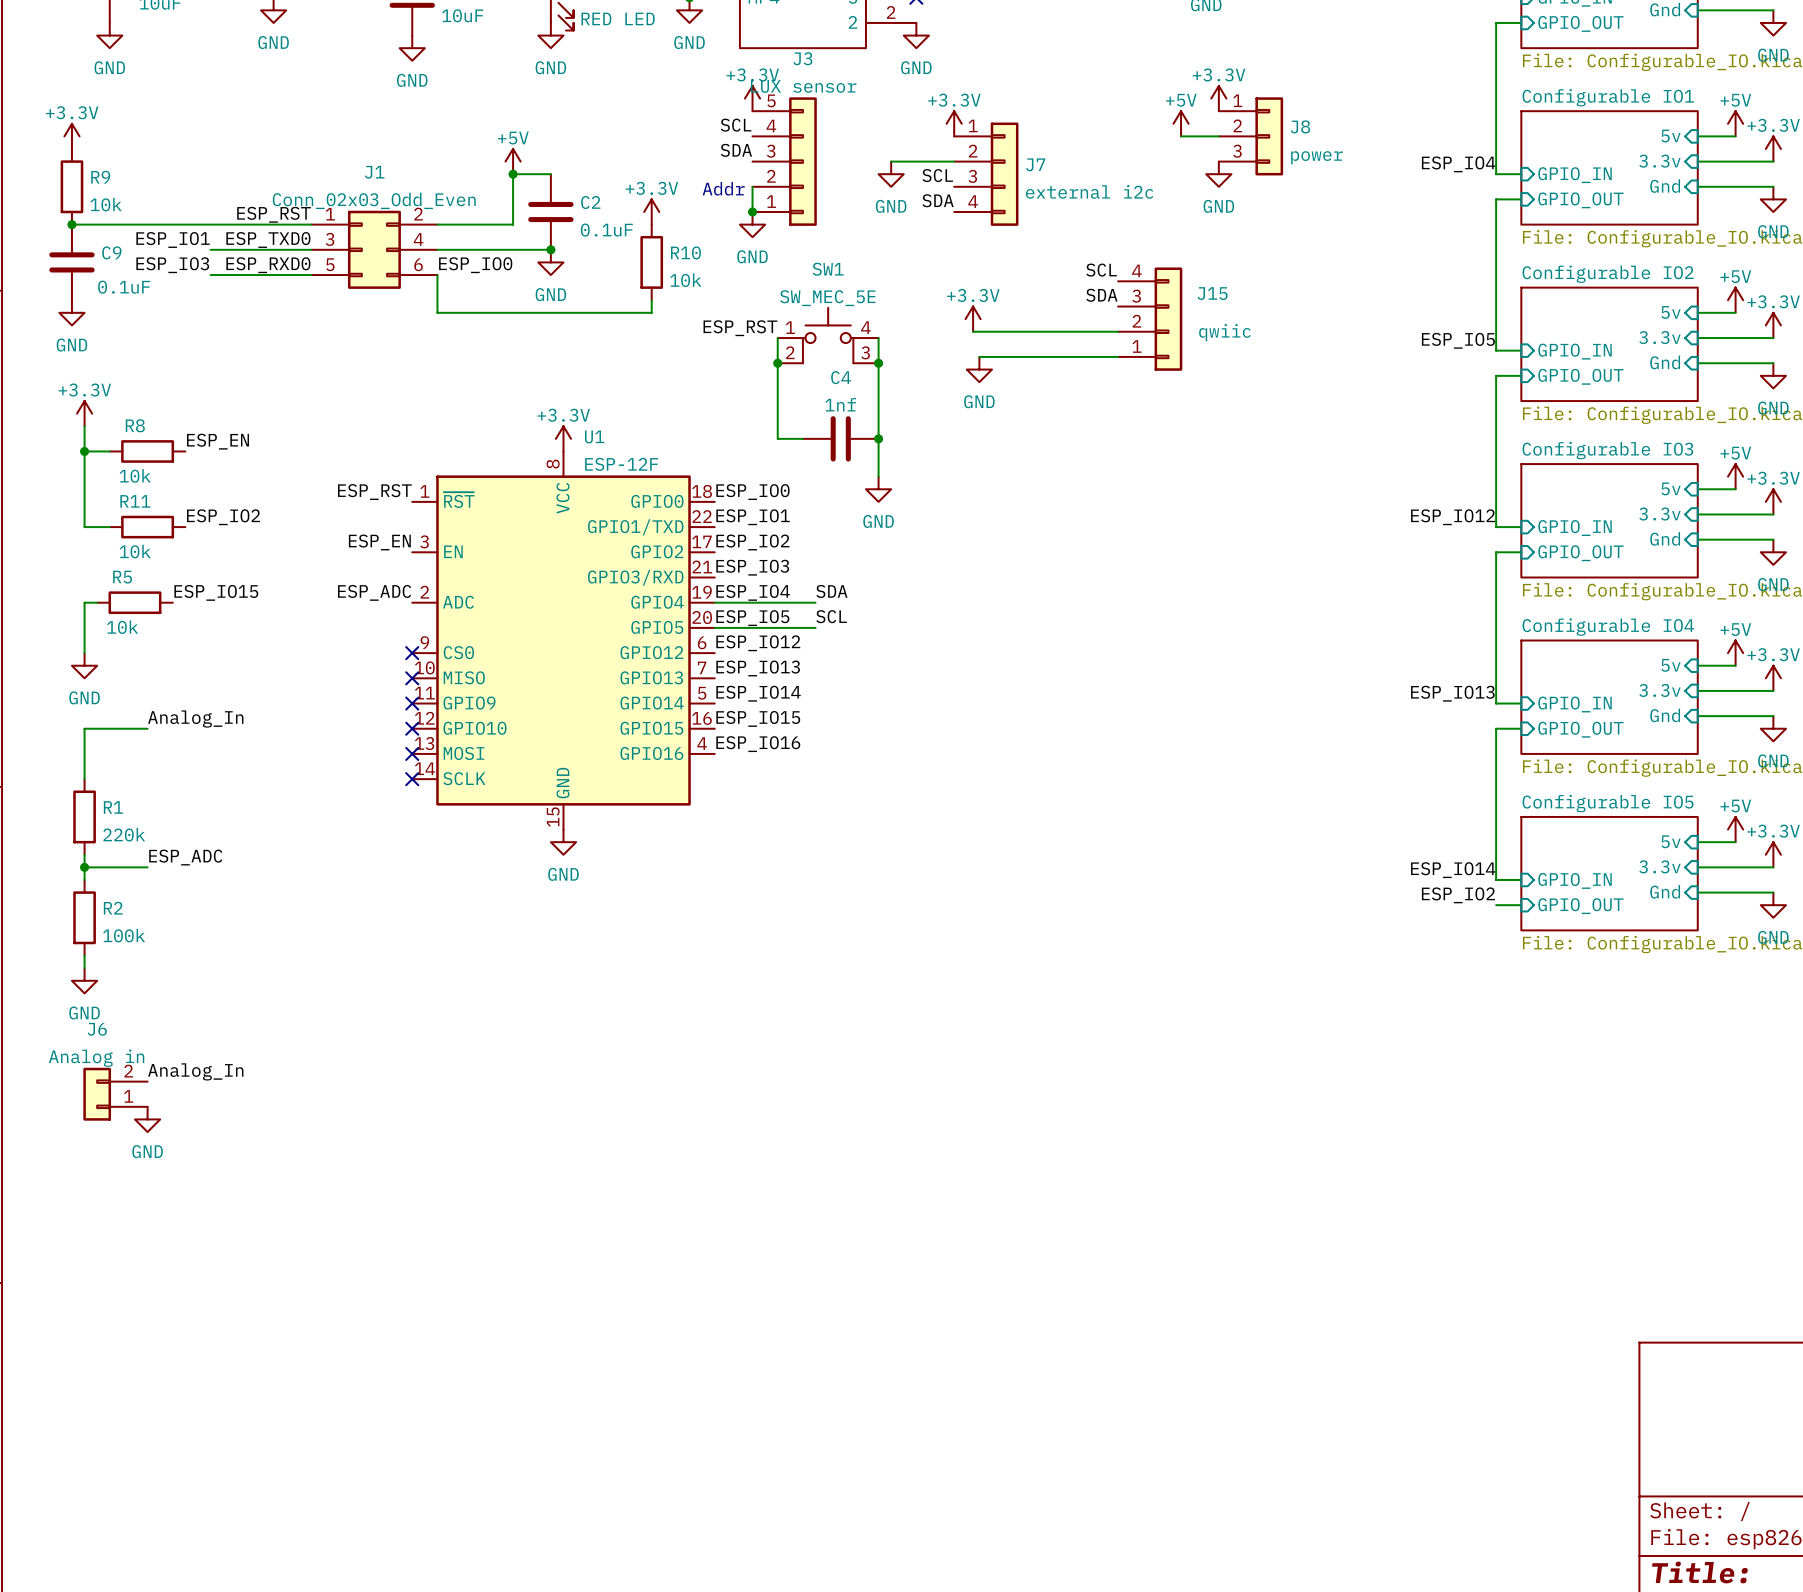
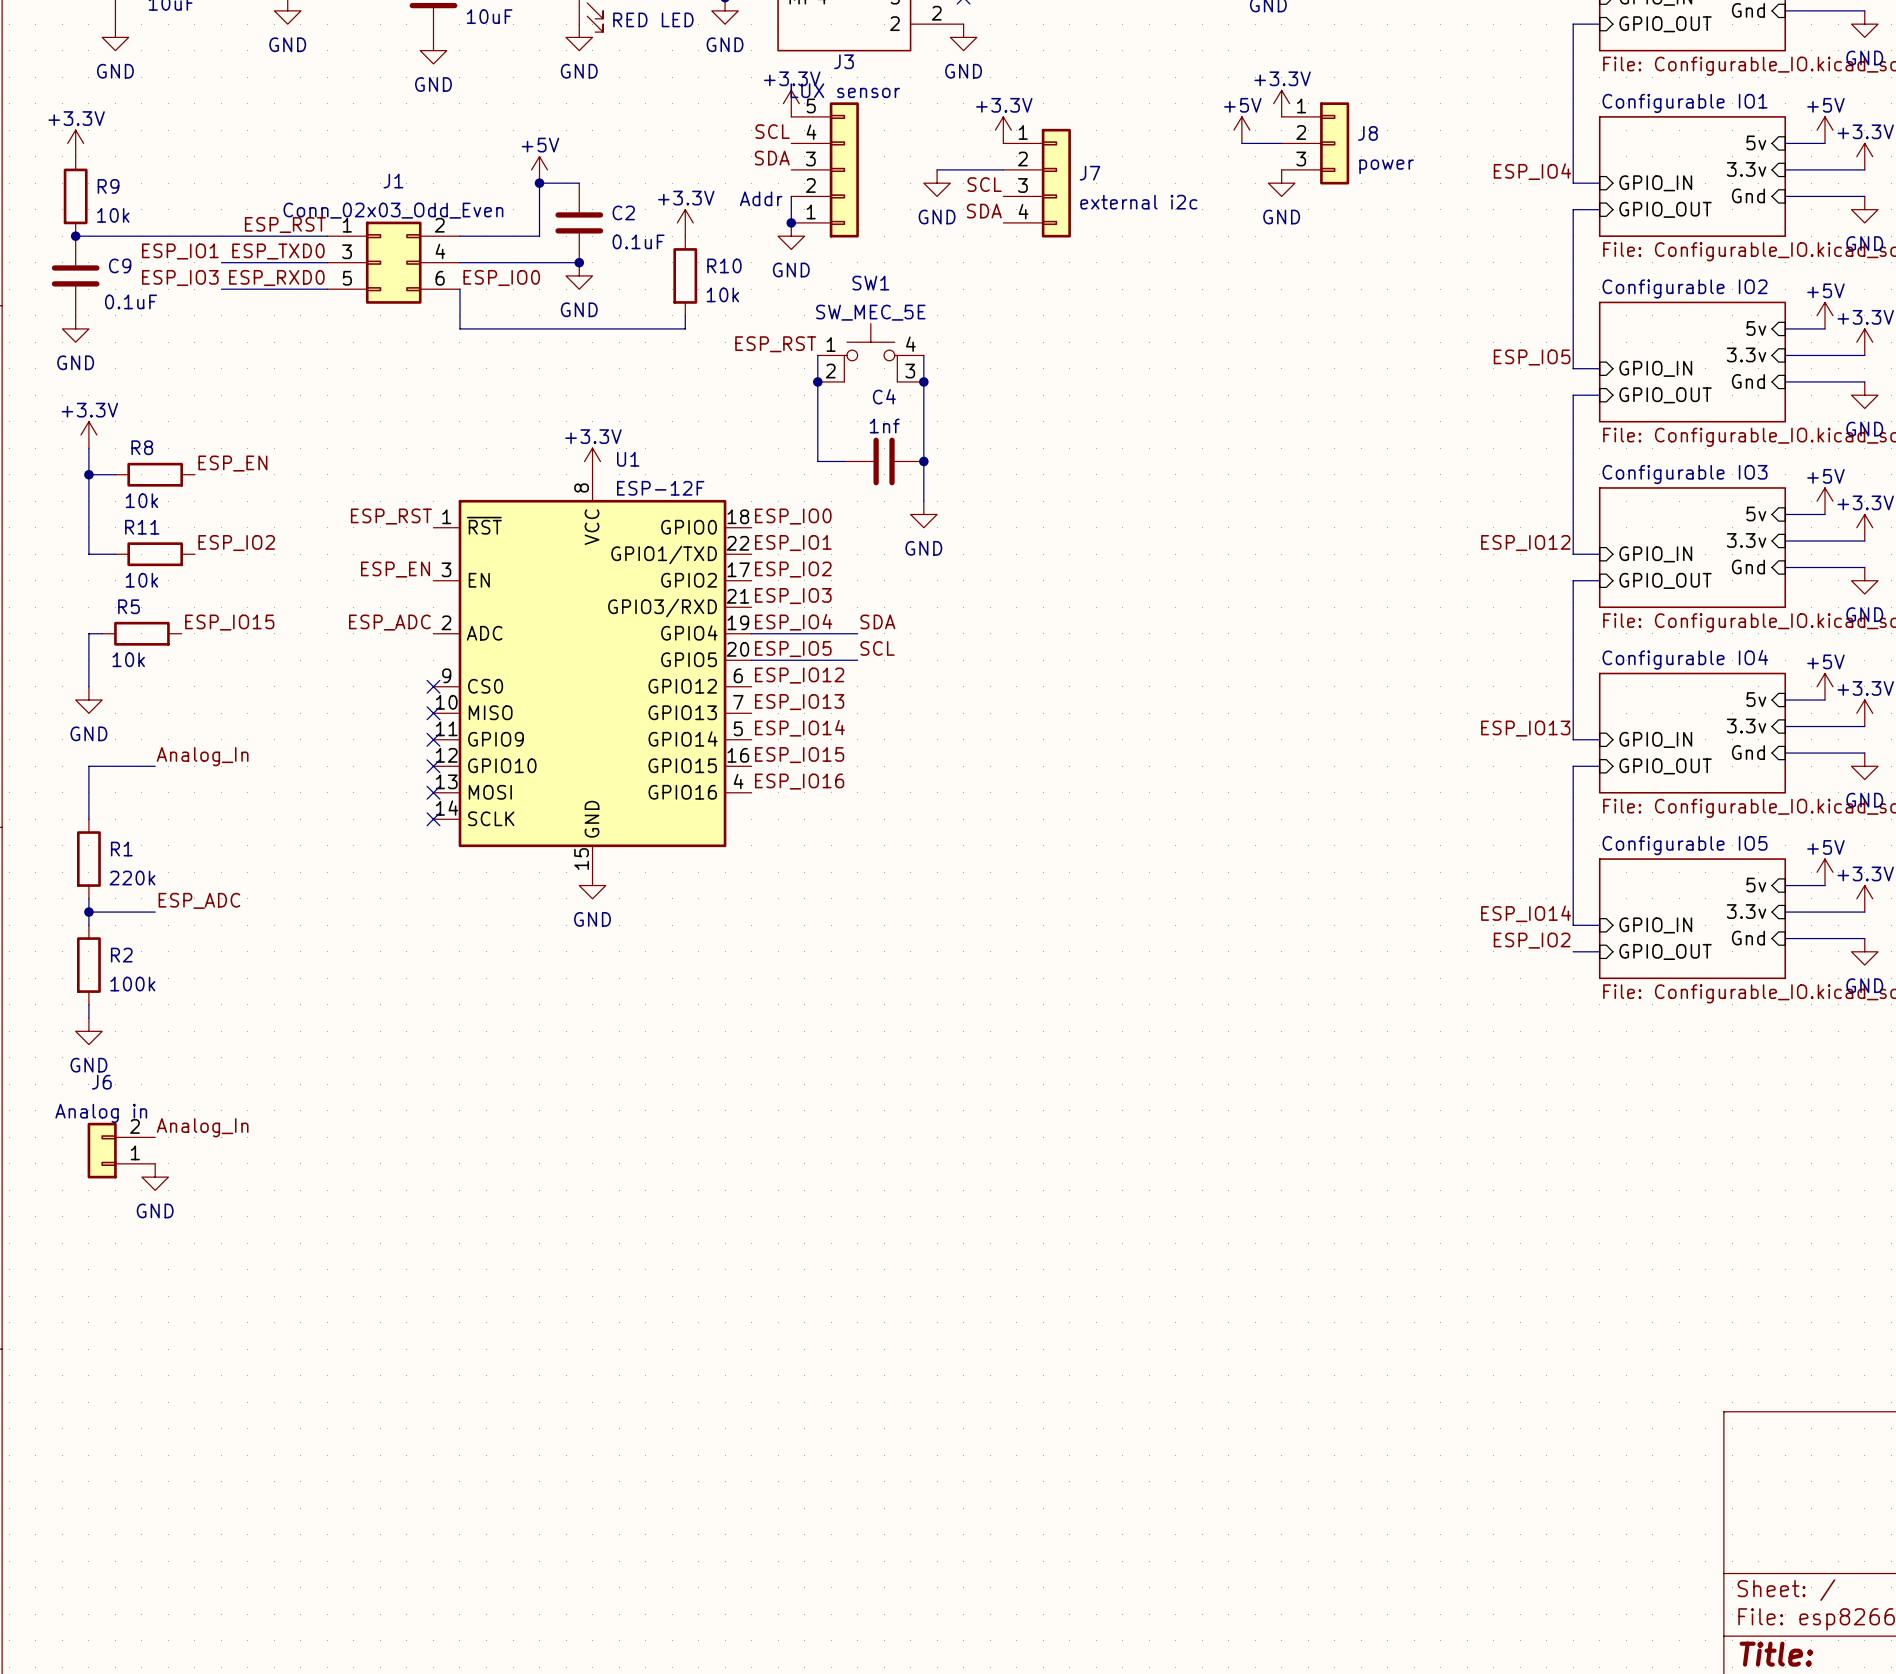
label: SCL (1101, 270) -> none
label: SDA (1101, 295) -> none
power symbol: +3.3V (973, 319) -> none
J15: qwiic (1150, 319) -> none
wire: (973, 331) (1118, 331) -> none
wire: (979, 356) (1118, 356) -> none
power symbol: GND (979, 369) -> none

